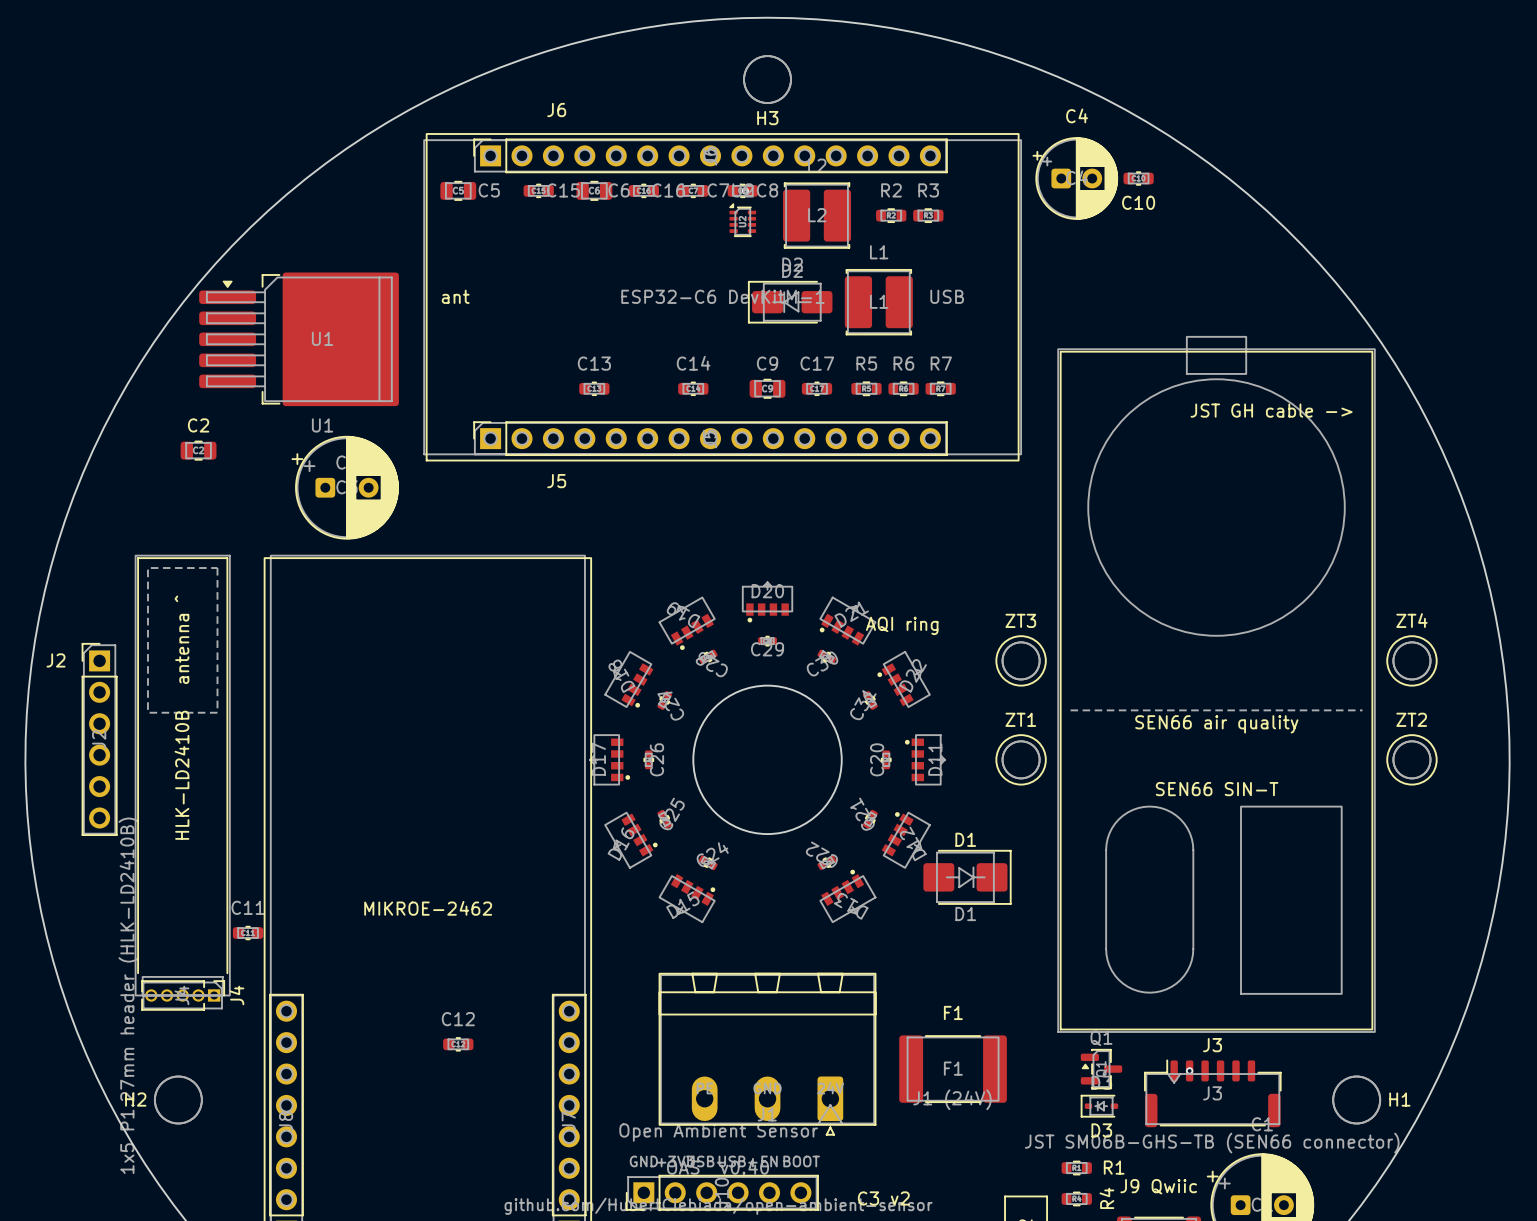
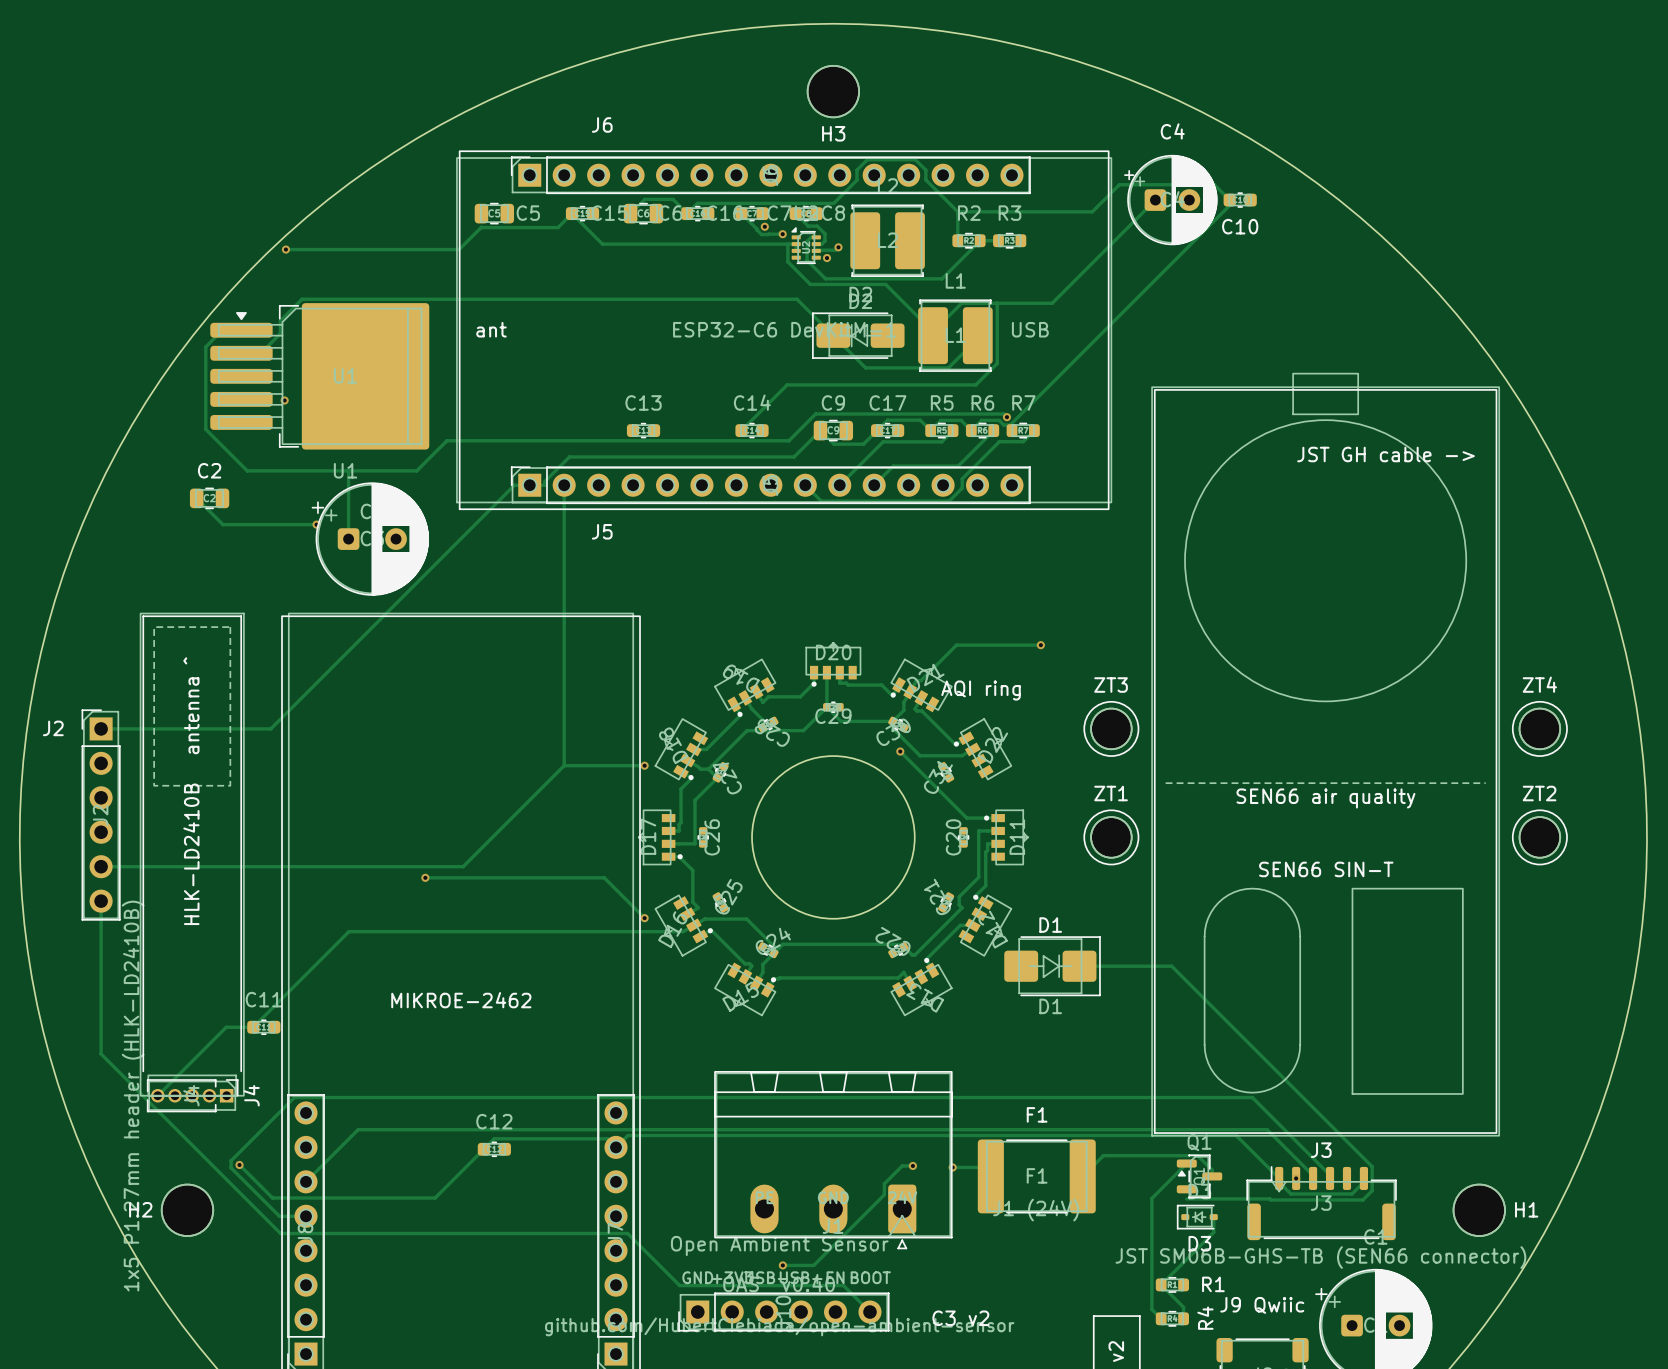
track: none -> (1155, 200) (1052, 303) (961, 303) (933, 331)
track: none -> (957, 211) (925, 179) (925, 170) (915, 159) (867, 159) (856, 170) (856, 180) (833, 203) (697, 203) (687, 213) (673, 199) (644, 199) (630, 213)
track: none -> (957, 211) (1092, 211) (1119, 184) (1214, 184) (1229, 200) (1229, 205) (1010, 424)
track: none -> (957, 211) (957, 240)
track: none -> (741, 213) (761, 234) (782, 234)
track: none -> (795, 213) (808, 226) (817, 226) (824, 233) (824, 240) (821, 244) (816, 244)
via: none -> (764, 226)
via: none -> (782, 234)
track: none -> (816, 237) (811, 237) (807, 241) (807, 260) (825, 278) (942, 278) (980, 240) (998, 240)
track: none -> (787, 244) (787, 261) (810, 284) (885, 284) (933, 331)
track: none -> (838, 247) (835, 250) (816, 250)
via: none -> (838, 247)
track: none -> (285, 249) (459, 249) (481, 227) (558, 227) (572, 213) (602, 244) (796, 244) (796, 250)
via: none -> (285, 249)
via: none -> (827, 258)
track: none -> (997, 303) (997, 363) (975, 384) (787, 384) (741, 430)
track: none -> (241, 330) (222, 330) (205, 346) (205, 429) (247, 470) (416, 470) (446, 440) (788, 440) (815, 413) (1003, 413) (1006, 417)
track: none -> (977, 335) (977, 338) (948, 367) (865, 367) (796, 299) (302, 299) (280, 320) (280, 333) (260, 353) (241, 353)
via: none -> (284, 400)
via: none -> (1006, 417)
track: none -> (1010, 424) (1003, 424) (999, 420) (981, 420) (971, 430) (961, 420) (940, 420) (930, 430) (920, 420) (887, 420) (863, 444) (834, 444) (820, 430) (794, 457) (569, 457) (545, 481) (545, 485) (514, 485) (270, 728) (101, 728)
track: none -> (953, 430) (941, 441) (883, 441) (839, 485)
track: none -> (993, 430) (958, 466) (893, 466) (874, 485)
track: none -> (1034, 430) (1023, 441) (999, 441) (962, 478) (962, 488) (949, 501) (821, 501) (805, 485)
track: none -> (348, 470) (348, 539)
track: none -> (564, 485) (564, 765)
track: none -> (196, 498) (222, 524) (316, 524)
via: none -> (316, 524)
track: none -> (1040, 645) (956, 645) (921, 680) (916, 680) (903, 702) (903, 710) (892, 721)
via: none -> (1040, 645)
track: none -> (814, 672) (814, 683) (800, 696) (768, 696) (762, 702) (756, 691)
track: none -> (826, 672) (826, 707) (803, 730) (747, 730) (708, 769)
track: none -> (839, 672) (839, 683) (848, 685) (881, 685) (892, 695) (899, 685)
track: none -> (745, 697) (751, 708) (762, 719) (762, 727) (765, 730)
track: none -> (921, 697) (915, 708) (917, 710) (921, 710) (955, 744) (966, 738)
track: none -> (734, 704) (740, 715) (706, 749) (693, 749)
track: none -> (826, 707) (841, 721) (892, 721)
track: none -> (892, 721) (892, 728) (920, 755) (961, 755) (972, 749)
track: none -> (900, 751) (966, 818) (998, 818)
via: none -> (900, 751)
track: none -> (687, 760) (700, 769) (708, 769)
track: none -> (564, 765) (463, 866) (101, 866)
track: none -> (564, 765) (644, 765)
via: none -> (644, 765)
track: none -> (708, 769) (717, 777) (694, 800) (694, 843) (668, 843)
track: none -> (681, 771) (691, 778) (681, 789) (681, 822) (679, 830) (668, 830)
track: none -> (998, 830) (978, 830) (978, 877) (959, 896) (959, 905) (962, 907) (915, 954) (912, 954) (901, 944) (783, 944) (762, 964) (762, 972) (756, 983)
track: none -> (998, 843) (987, 843) (985, 852) (985, 885) (974, 896) (985, 903)
track: none -> (668, 856) (679, 856) (692, 870) (692, 902) (698, 907) (687, 914)
track: none -> (425, 877) (604, 877) (644, 918)
via: none -> (425, 877)
track: none -> (101, 901) (101, 1054) (280, 1233) (627, 1233) (679, 1285) (843, 1285) (869, 1312)
via: none -> (644, 918)
track: none -> (972, 925) (960, 925) (926, 959) (932, 970)
track: none -> (700, 936) (711, 930) (744, 963) (749, 963) (751, 965) (745, 976)
track: none -> (773, 953) (773, 946) (746, 919) (704, 919) (682, 931) (348, 931) (253, 1027) (226, 1027) (157, 1095)
track: none -> (1079, 966) (1171, 966) (1372, 1166) (1372, 1190) (1362, 1199) (1186, 1198)
track: none -> (910, 983) (903, 972) (898, 977) (779, 977) (774, 978) (767, 989)
track: none -> (1186, 1163) (1151, 1198) (1151, 1309) (1161, 1318)
track: none -> (239, 1164) (272, 1198) (435, 1198) (494, 1138) (607, 1138) (616, 1147) (627, 1135) (1236, 1135) (1279, 1178) (1279, 1182) (1290, 1194) (1352, 1194) (1363, 1182) (1363, 1178)
via: none -> (239, 1164)
track: none -> (912, 1165) (902, 1165) (884, 1183) (884, 1194) (813, 1265) (782, 1265)
via: none -> (912, 1165)
track: none -> (952, 1167) (981, 1167) (990, 1176)
via: none -> (952, 1167)
track: none -> (1082, 1176) (1103, 1155) (1197, 1155) (1212, 1170) (1212, 1176)
track: none -> (1313, 1178) (1313, 1175) (1267, 1129) (358, 1129) (306, 1181)
track: none -> (1330, 1178) (1330, 1175) (1252, 1097) (294, 1097) (231, 1160) (231, 1167) (279, 1216) (306, 1216)
track: none -> (1213, 1217) (1213, 1232) (1161, 1284) (1183, 1307) (1183, 1318)
via: none -> (782, 1265)

